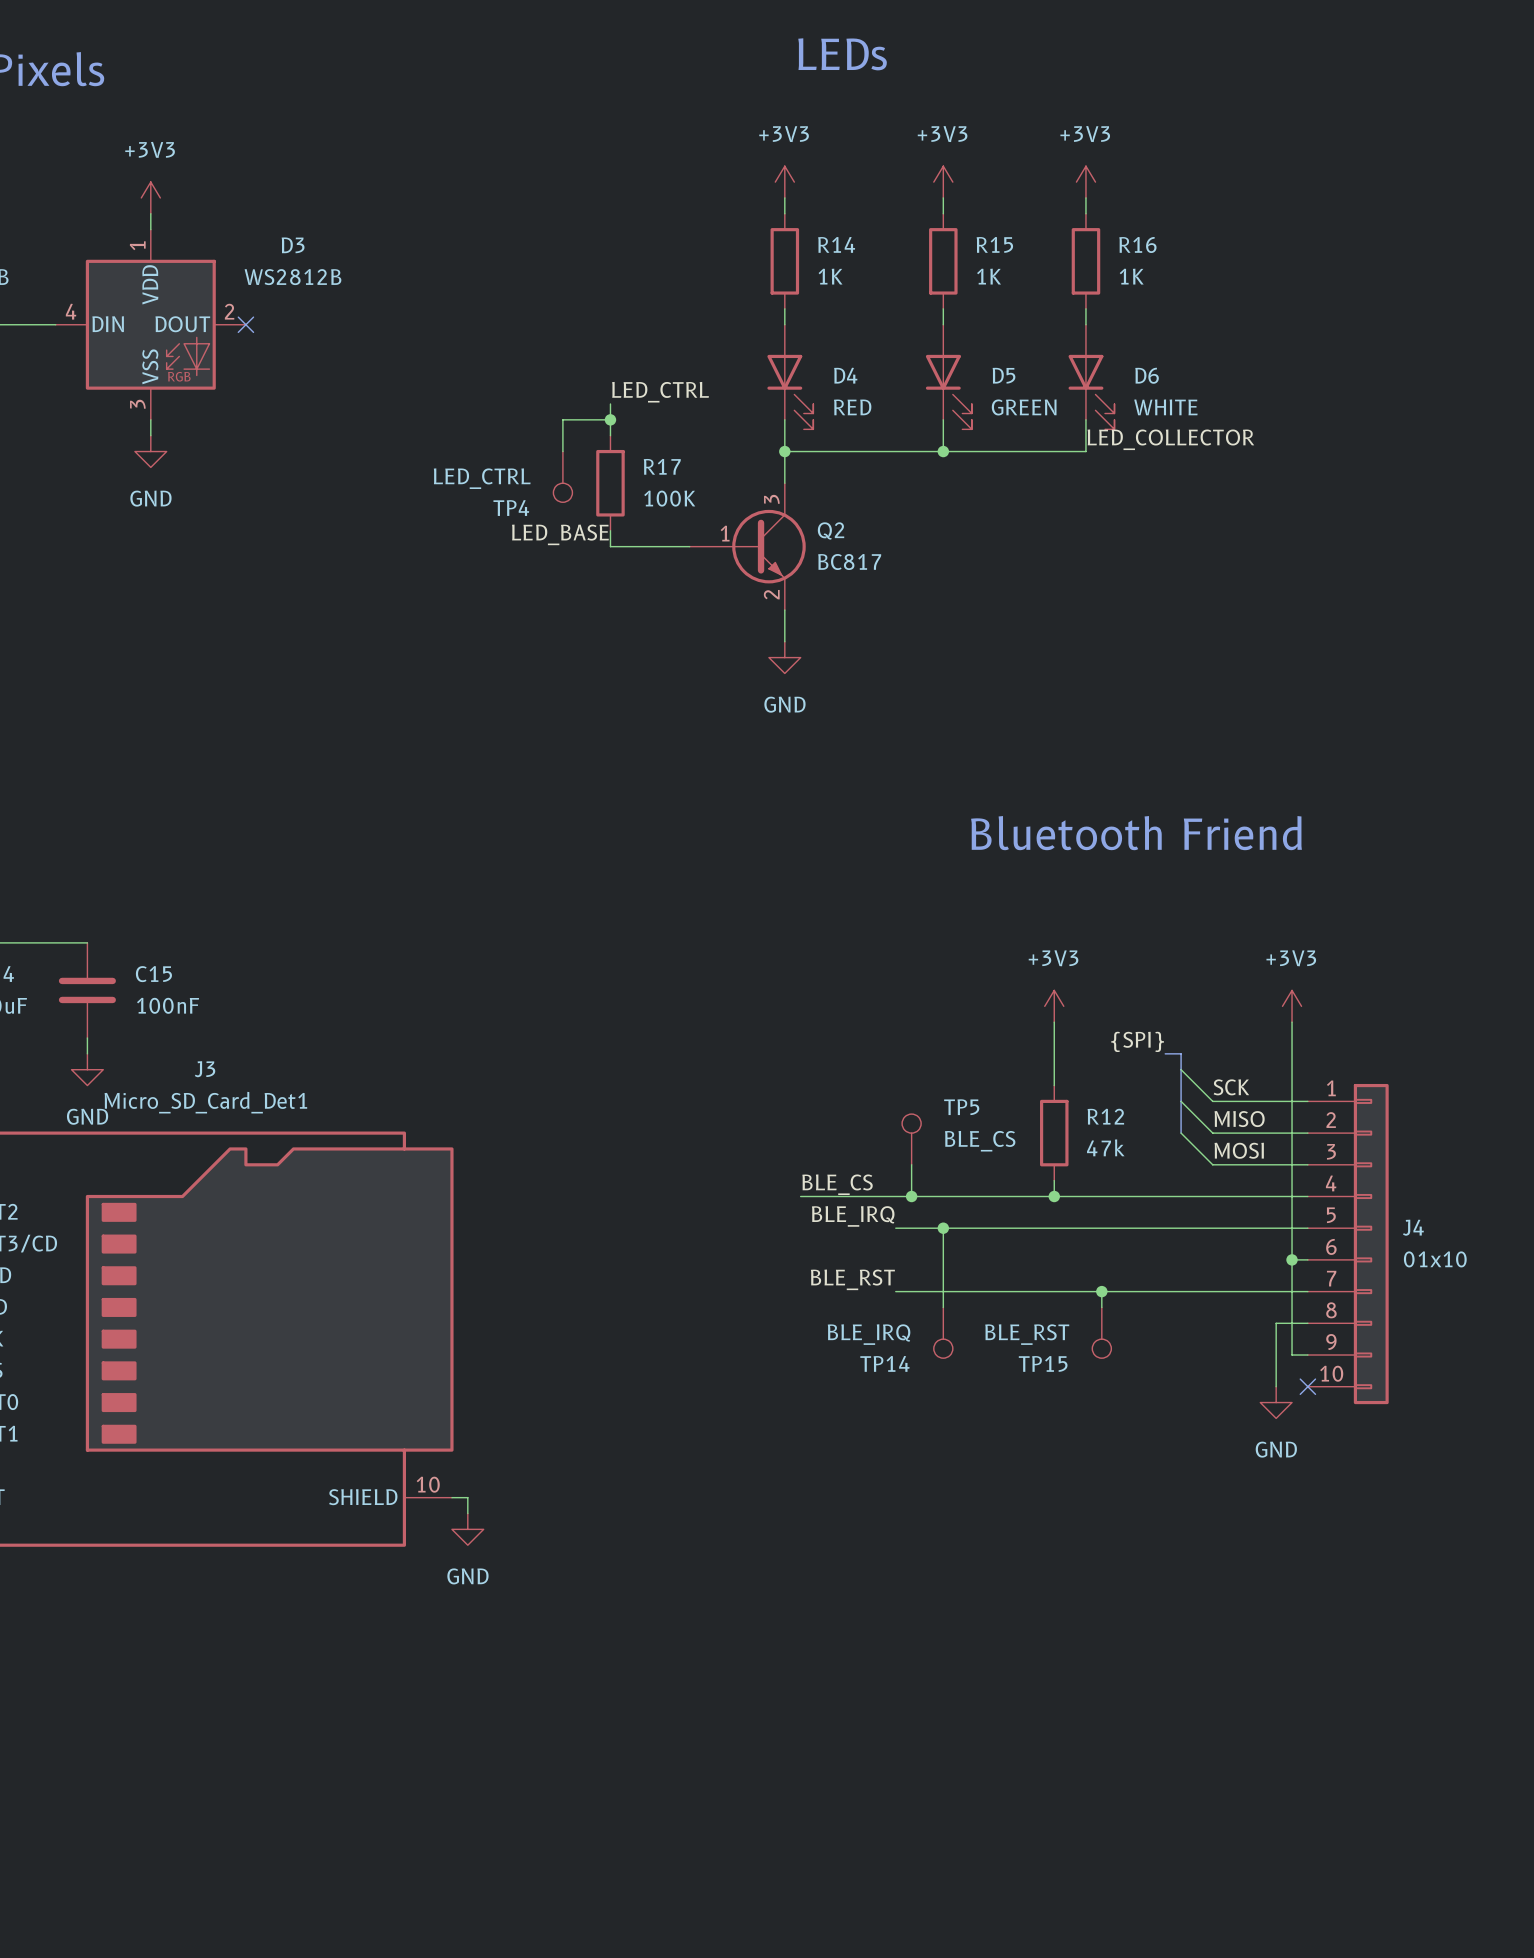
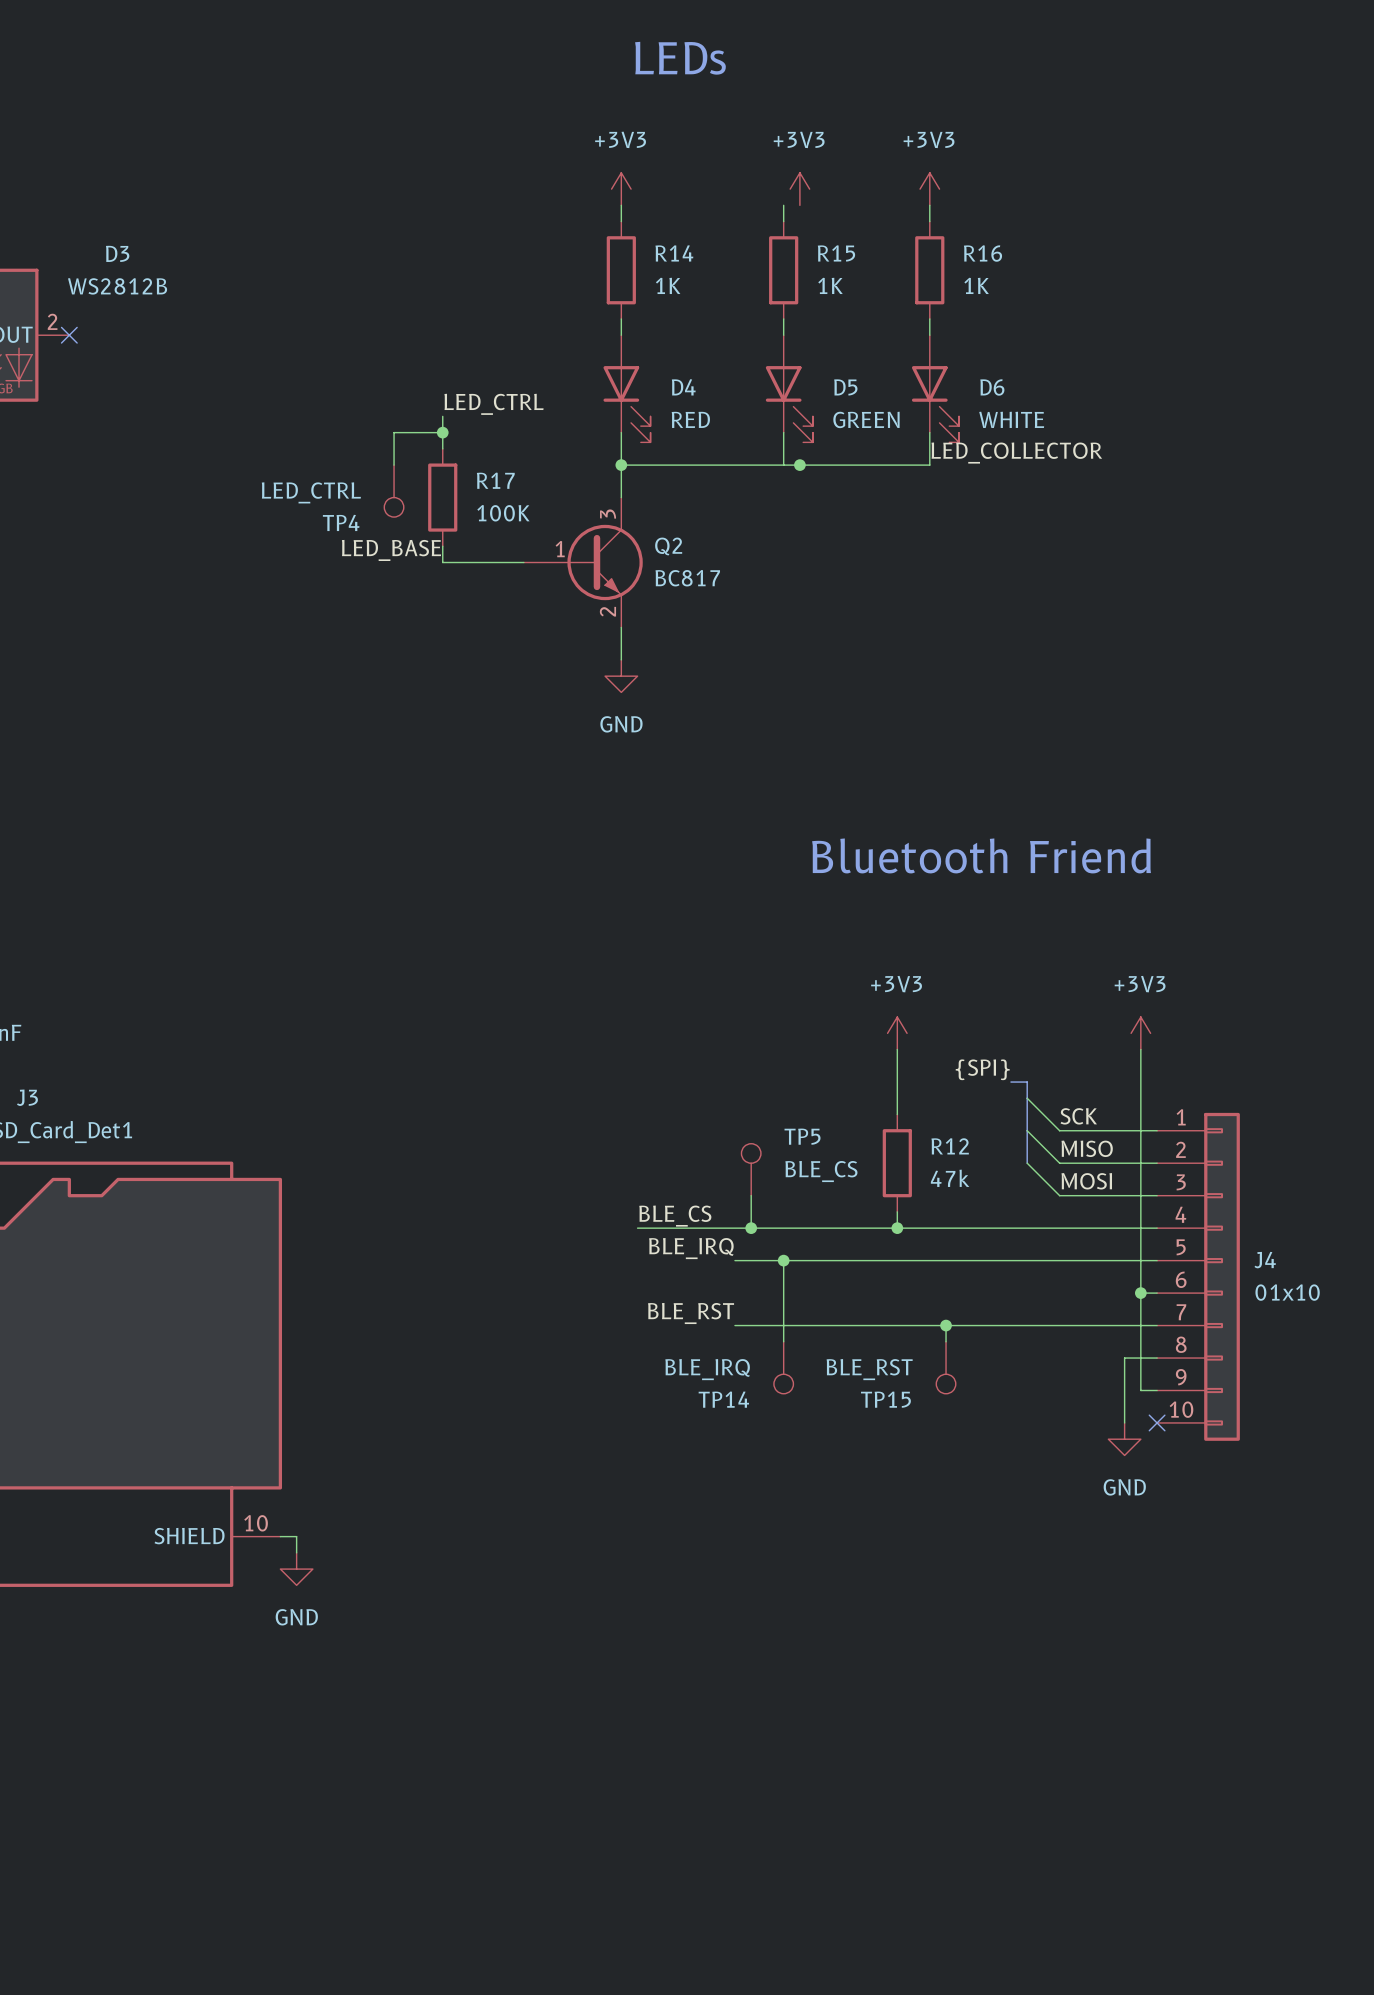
power symbol position: +3V3 (943, 182) -> +3V3 (799, 189)
junction position: (943, 451) -> (799, 465)

